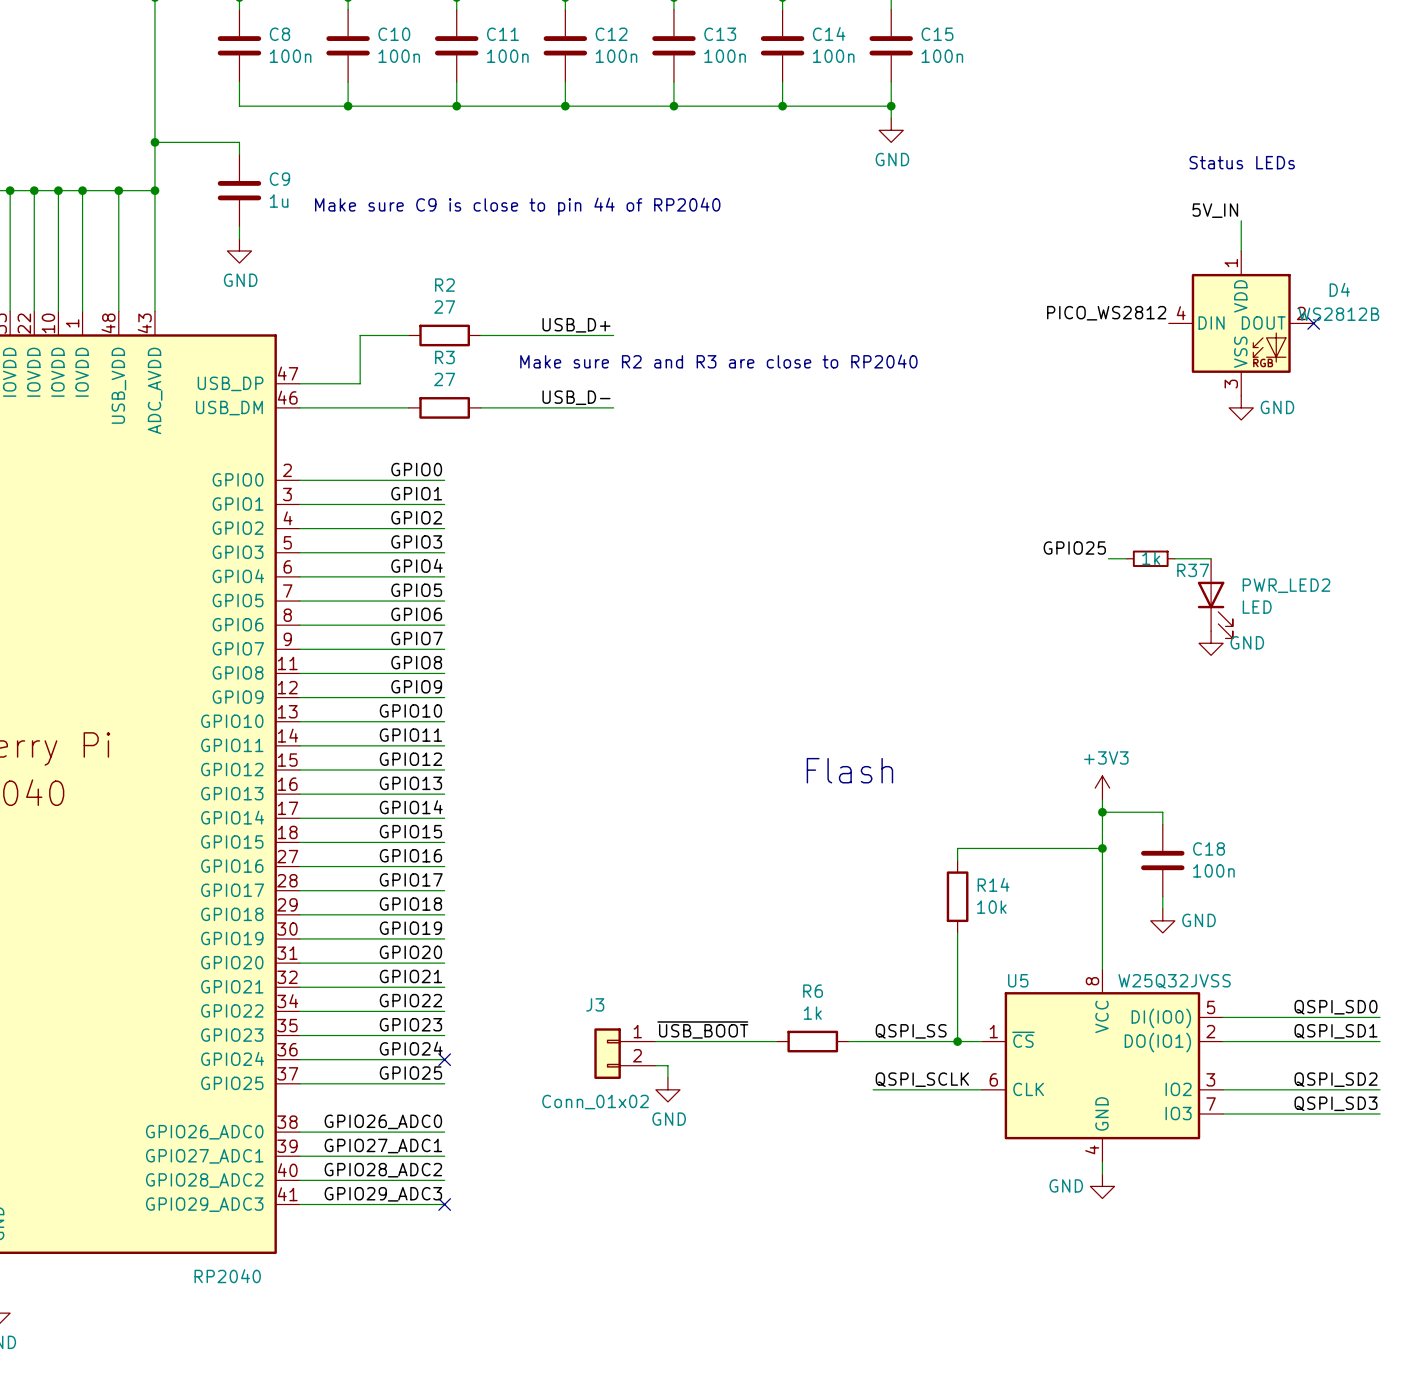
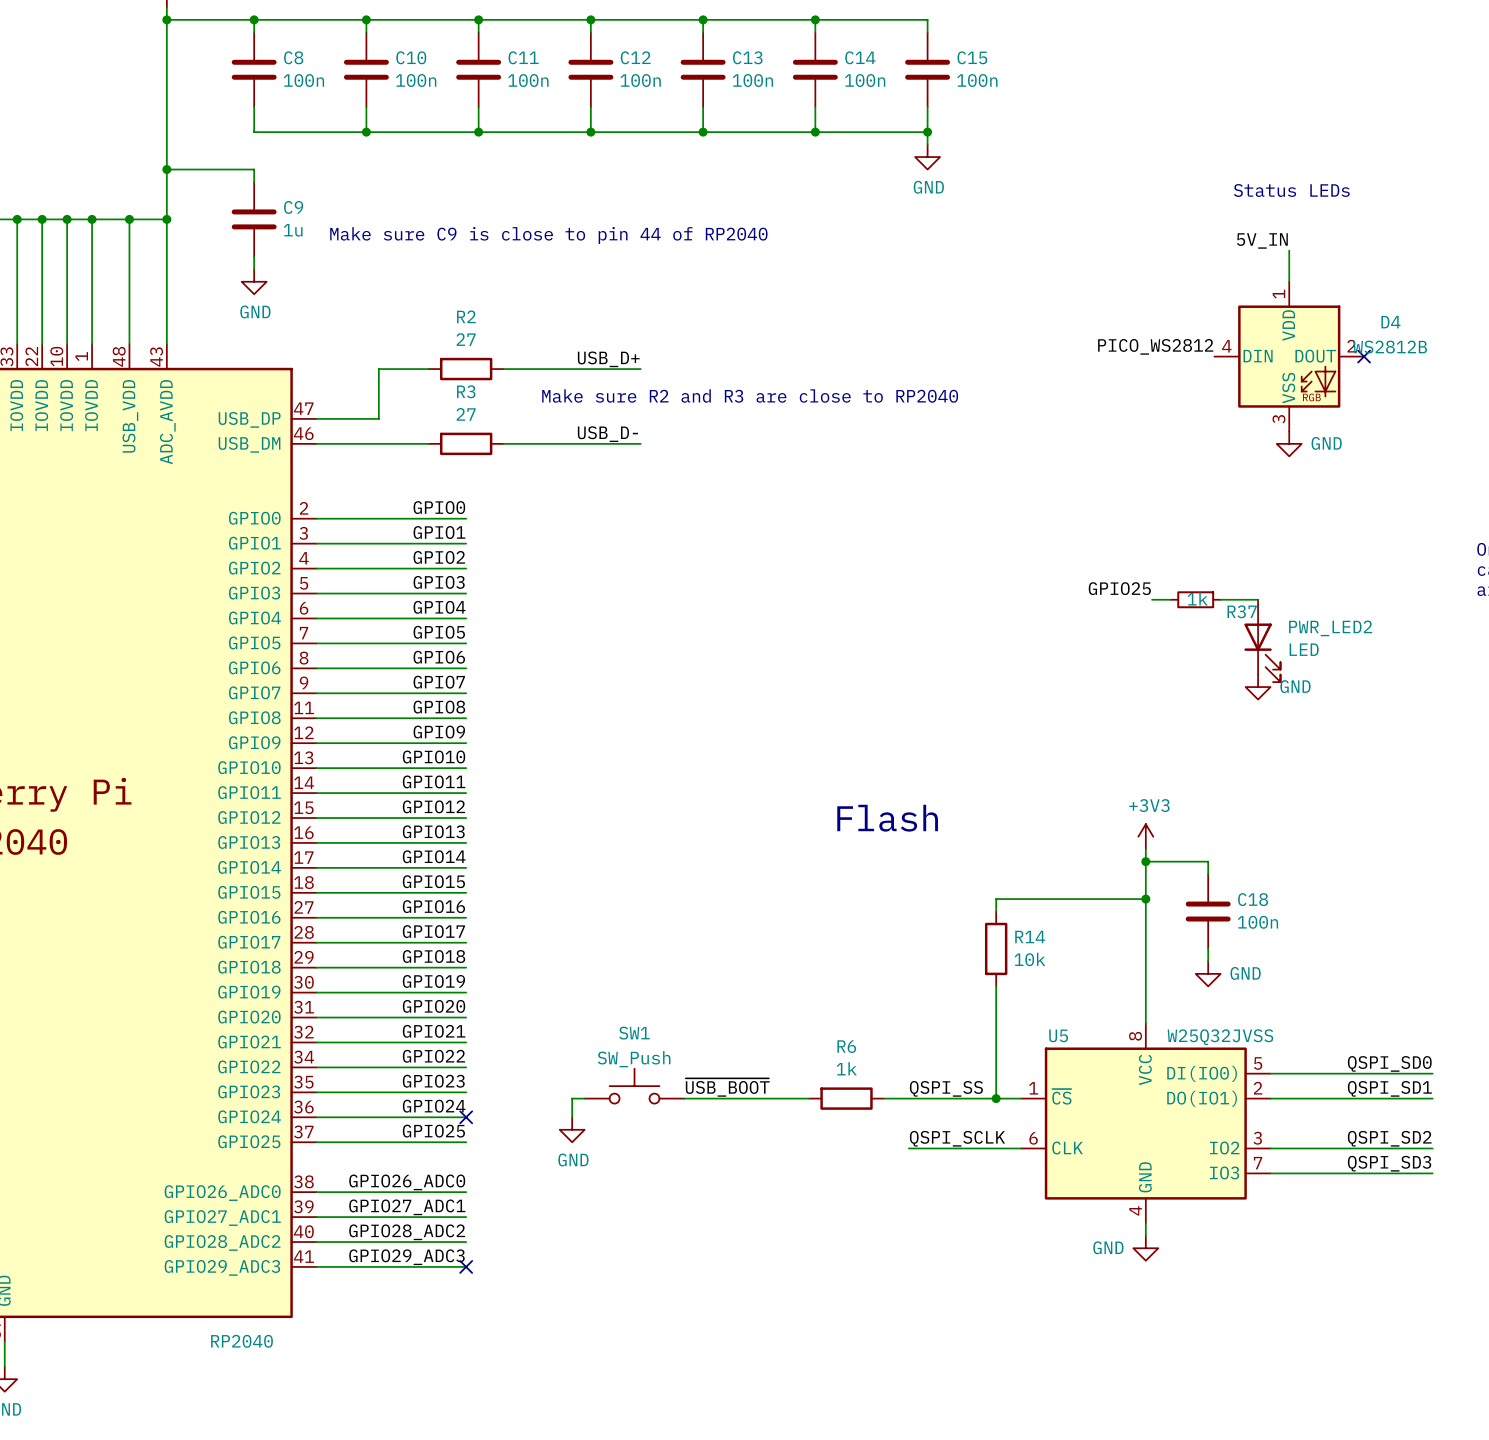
SW1: none -> SW_Push (634, 1086)
wire: none -> (584, 1098) (572, 1098) (572, 1117)
J3: Conn_01x02 (625, 1053) -> none
wire: (655, 1065) (667, 1065) (667, 1077) -> none
power symbol position: GND (667, 1089) -> GND (572, 1129)

